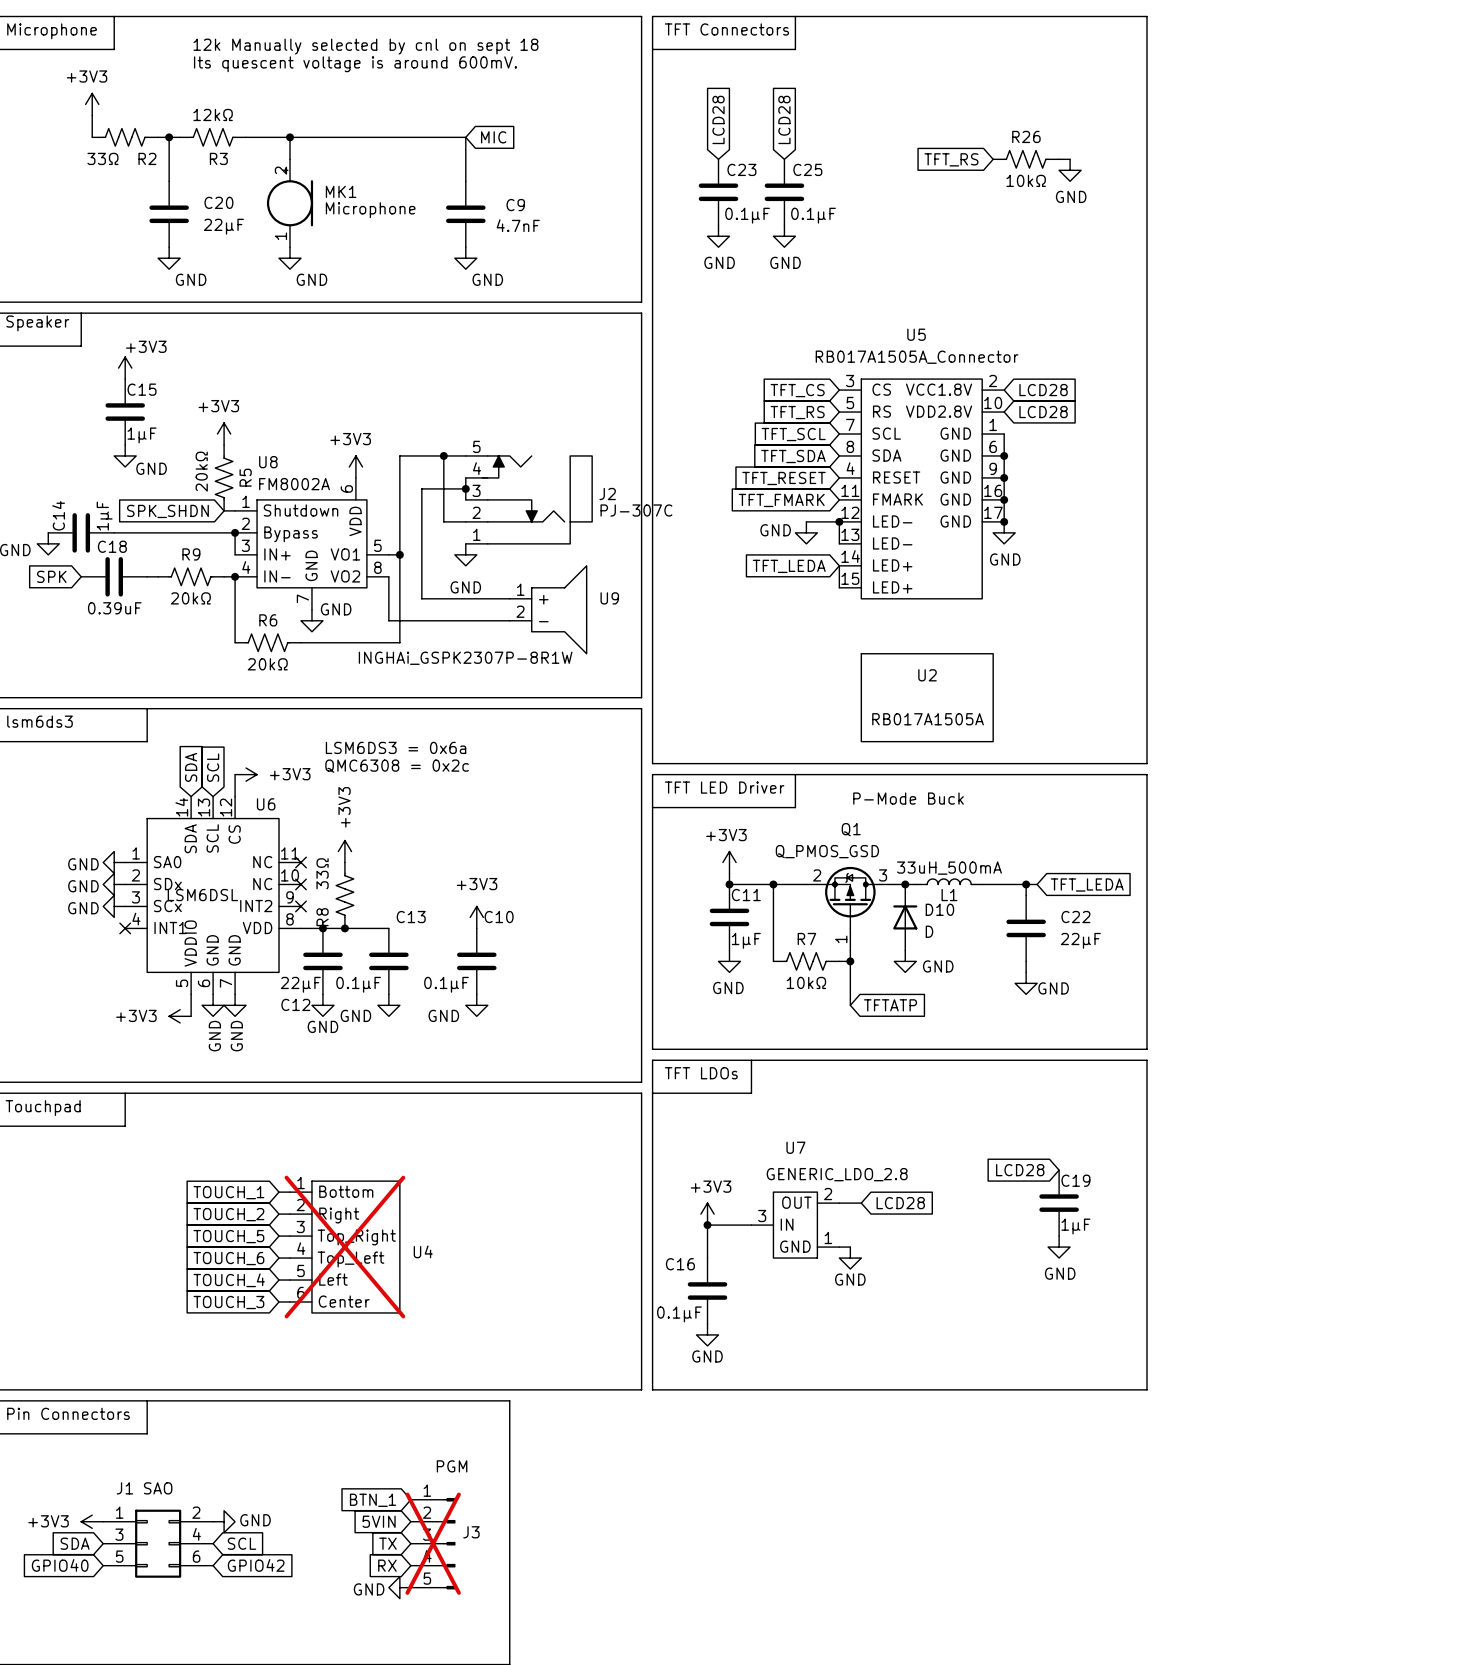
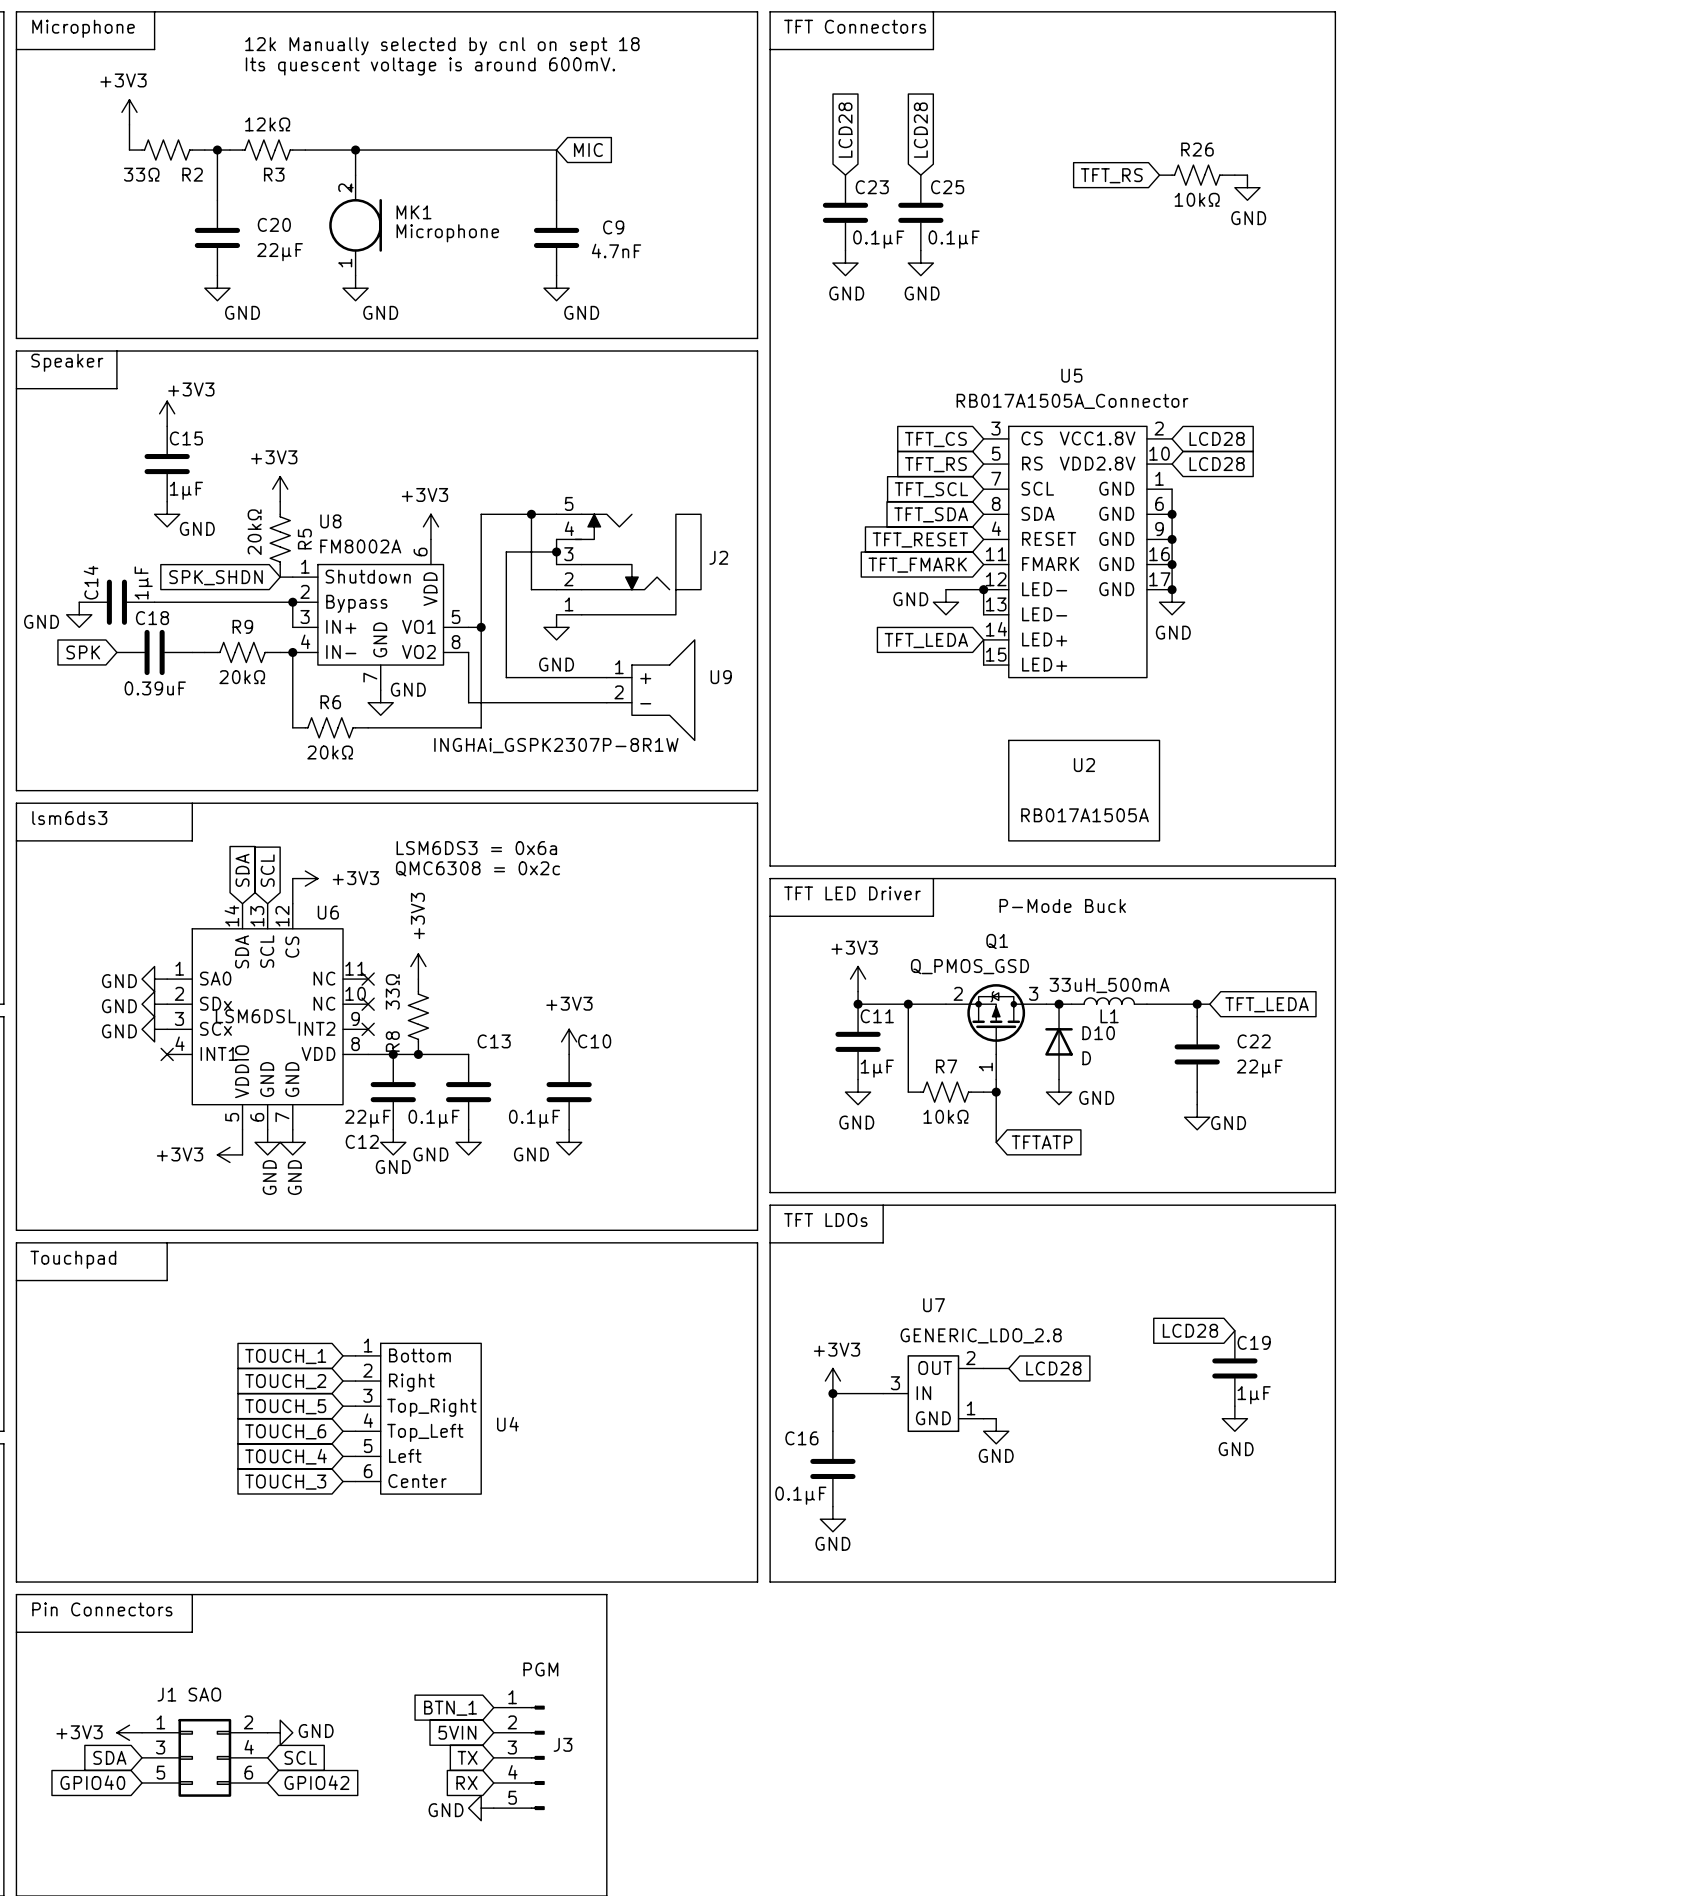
J2 value: PJ-307C (636, 510) -> none
U4 do-not-place cross: (344, 1247) -> none
J3 do-not-place cross: (433, 1543) -> none

